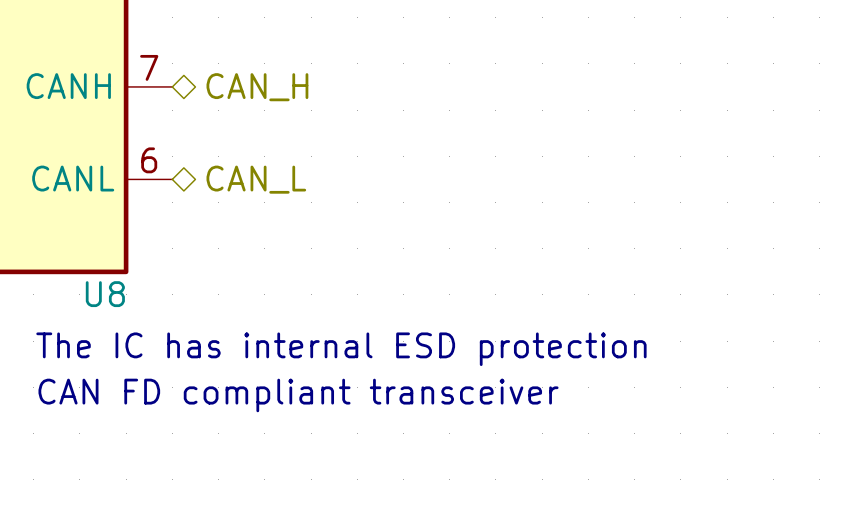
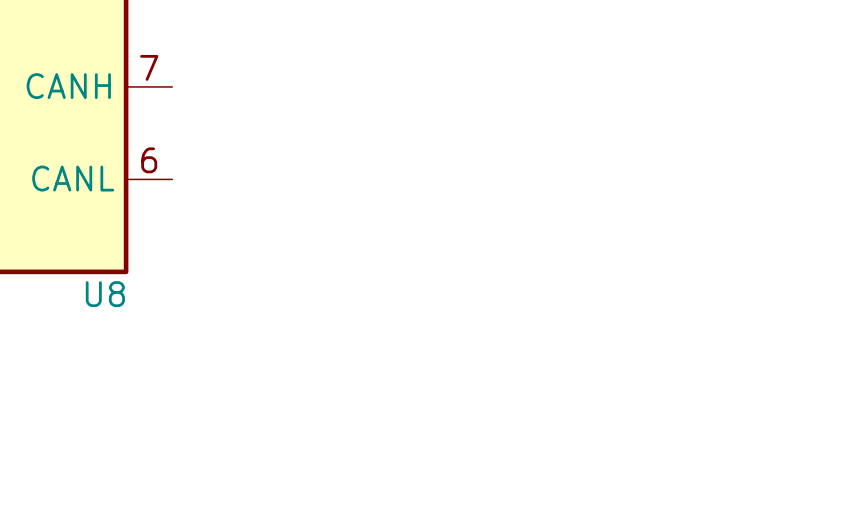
hierarchical label: CAN_H (257, 87) -> none
hierarchical label: CAN_L (256, 179) -> none
text: The IC has internal ESD protection (341, 349) -> none
text: CAN FD compliant transceiver (298, 395) -> none

